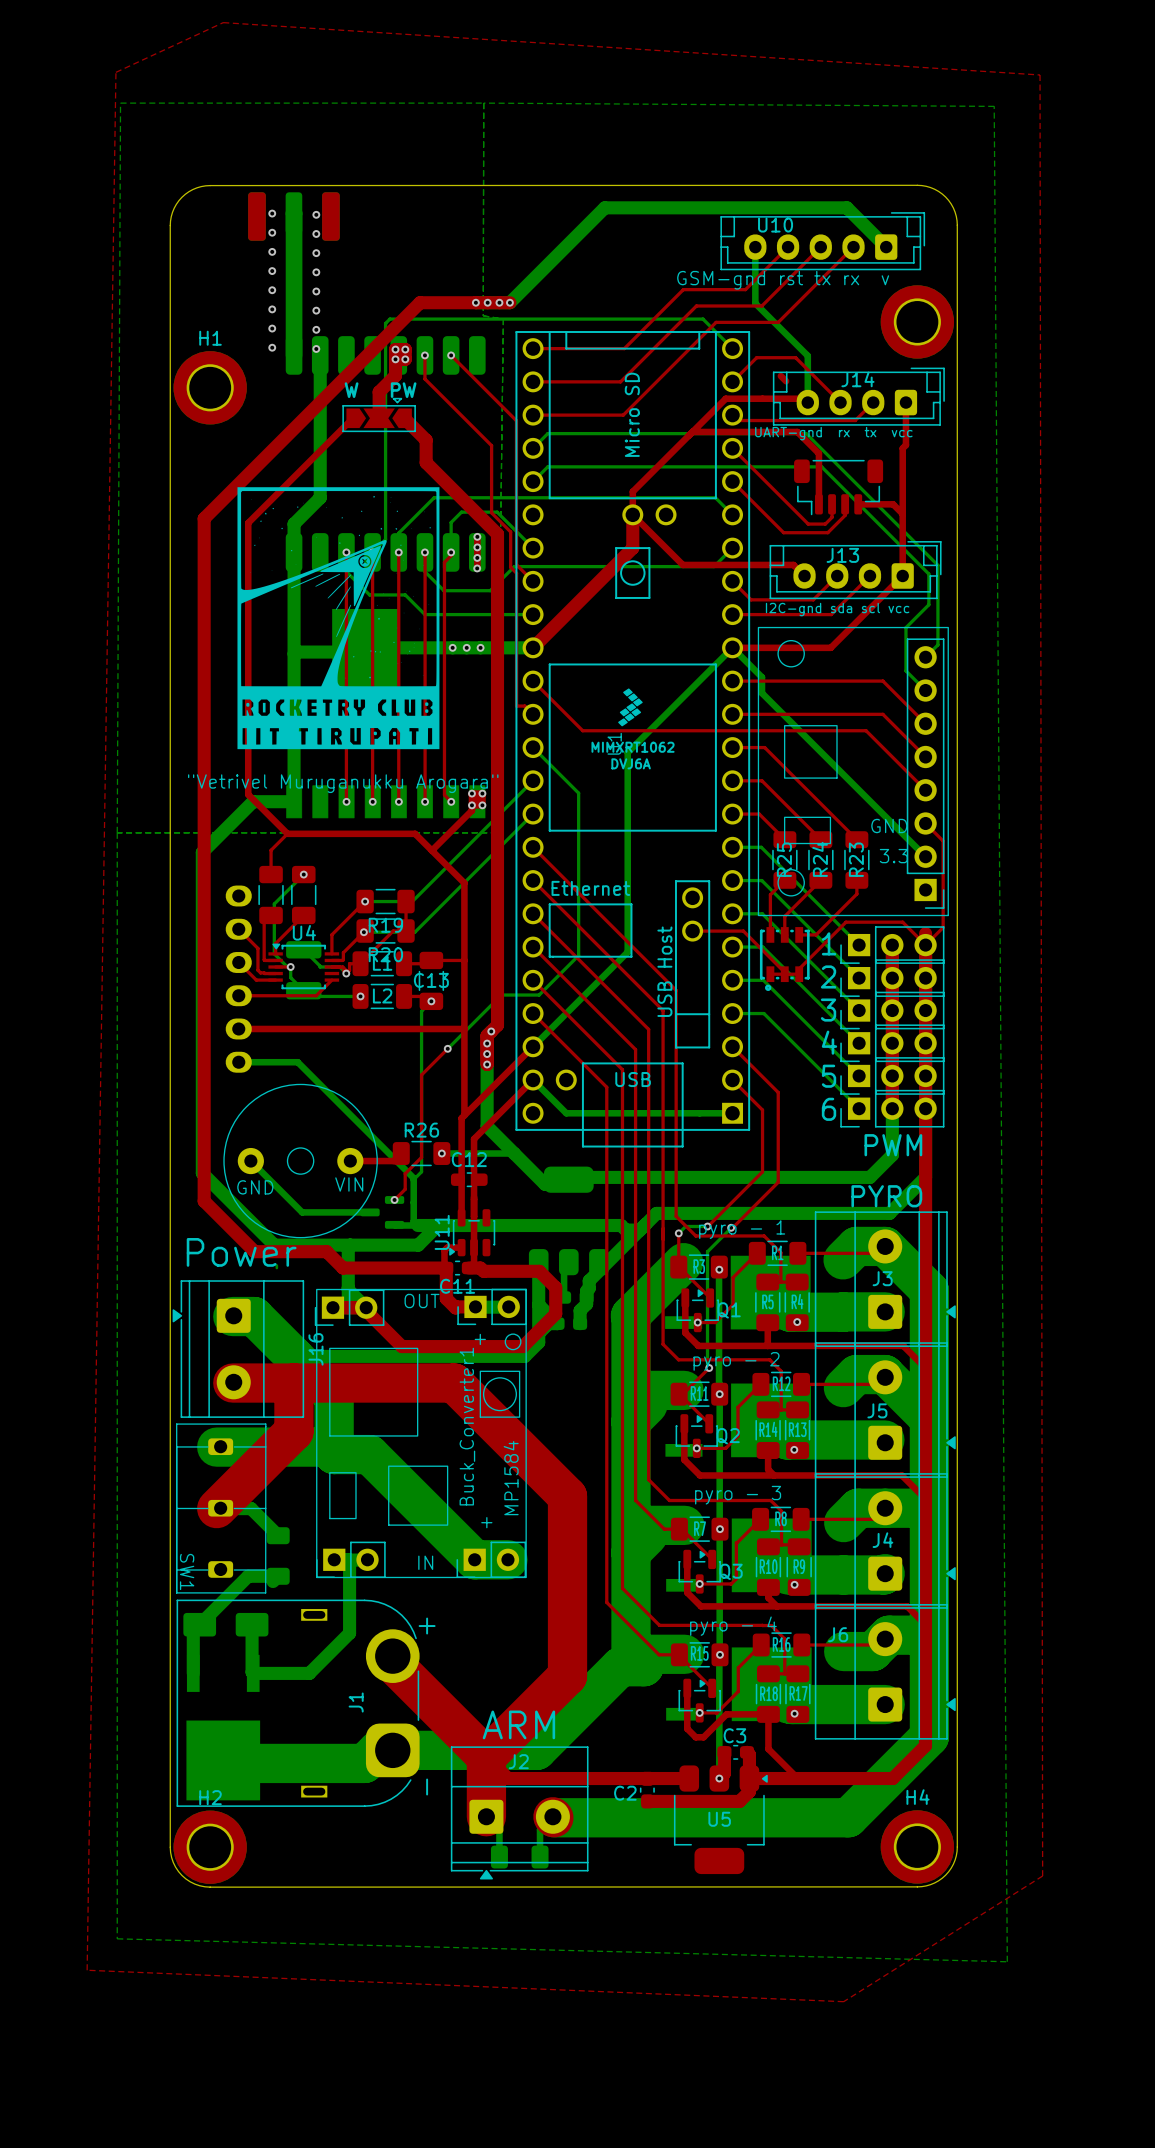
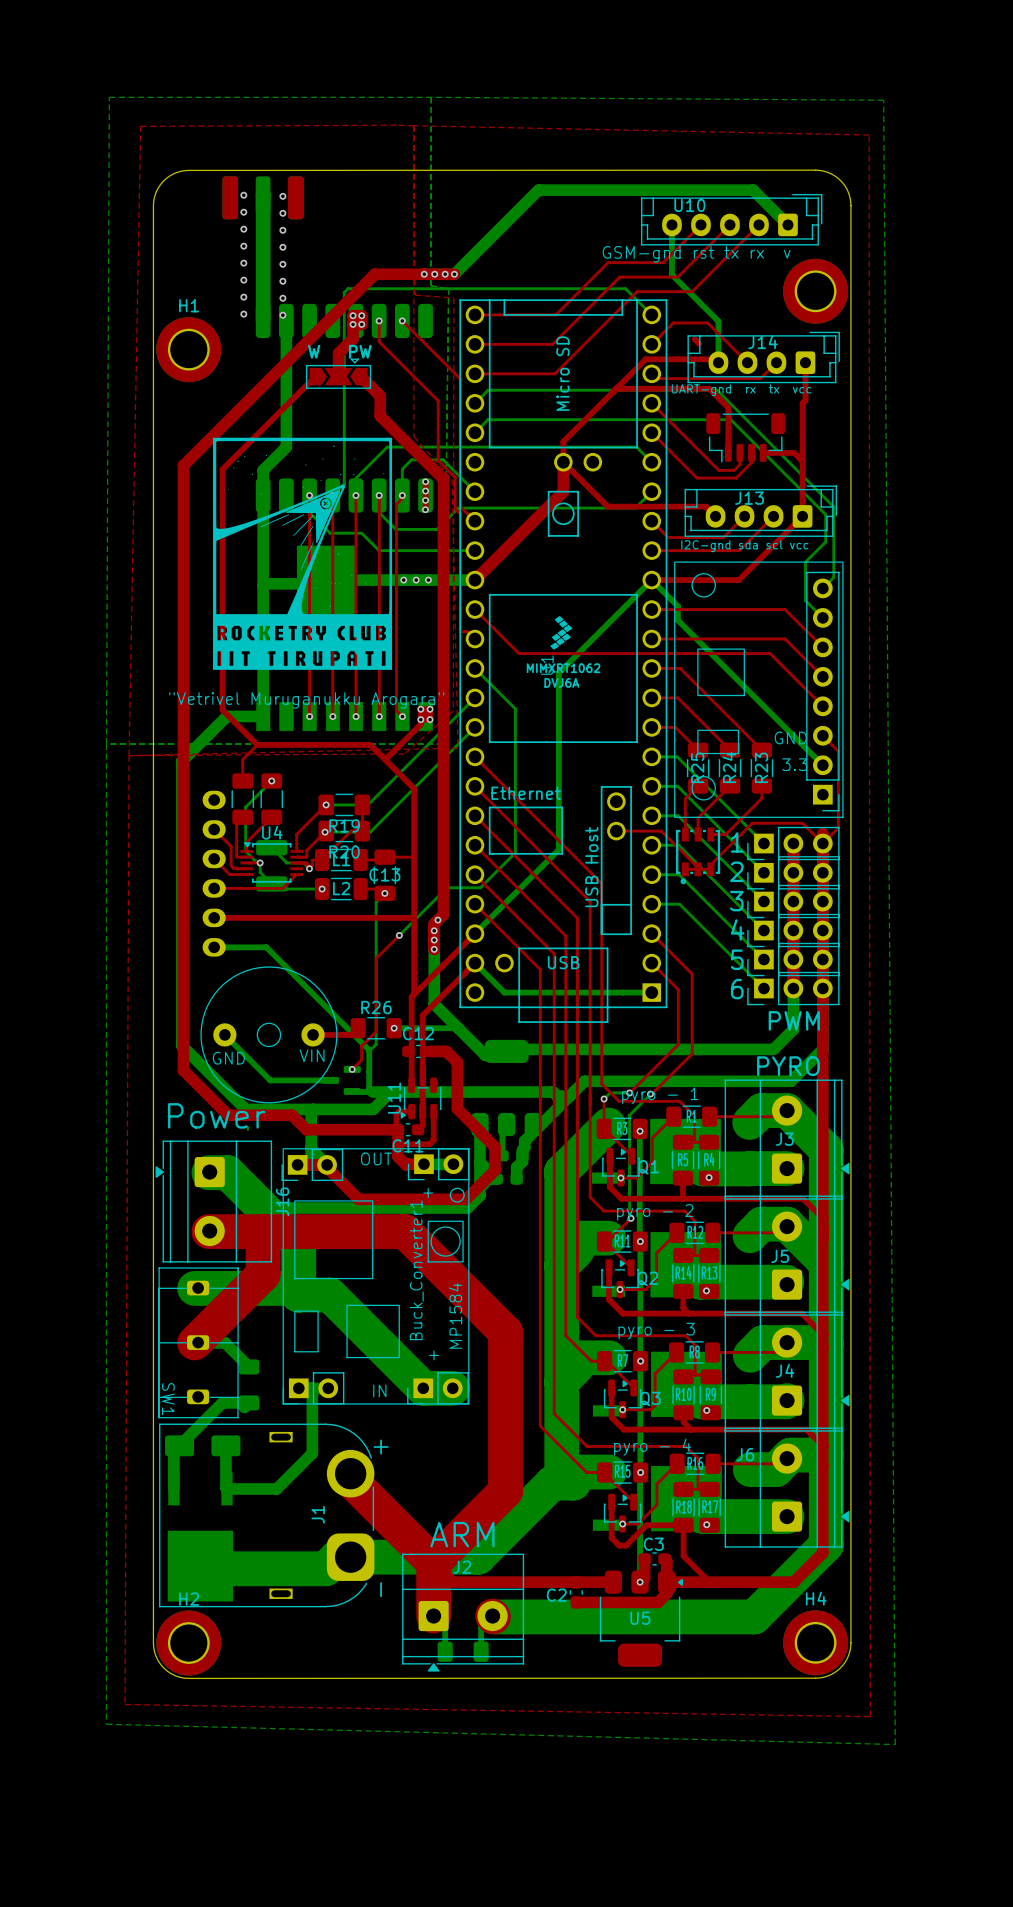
top zone outline: (223, 22) (115, 72) (87, 1970) (843, 2001) (1042, 1876) (1040, 74) (223, 22) -> none
top zone outline: none -> (413, 125) (140, 126) (129, 755)
top zone outline: none -> (413, 125) (415, 295) (453, 298) (453, 710) (404, 753) (129, 755)
top zone outline: none -> (413, 125) (413, 436) (452, 479) (457, 748) (129, 755)
top zone outline: none -> (413, 125) (869, 135) (870, 1716) (125, 1704) (129, 755)
top track: none -> (433, 1111) (433, 1140) (429, 1144) (398, 1144)
top track: (468, 1268) (480, 1268) (483, 1271) (539, 1271) -> (428, 1051) (446, 1051) (457, 1062) (457, 1108) (480, 1132)

